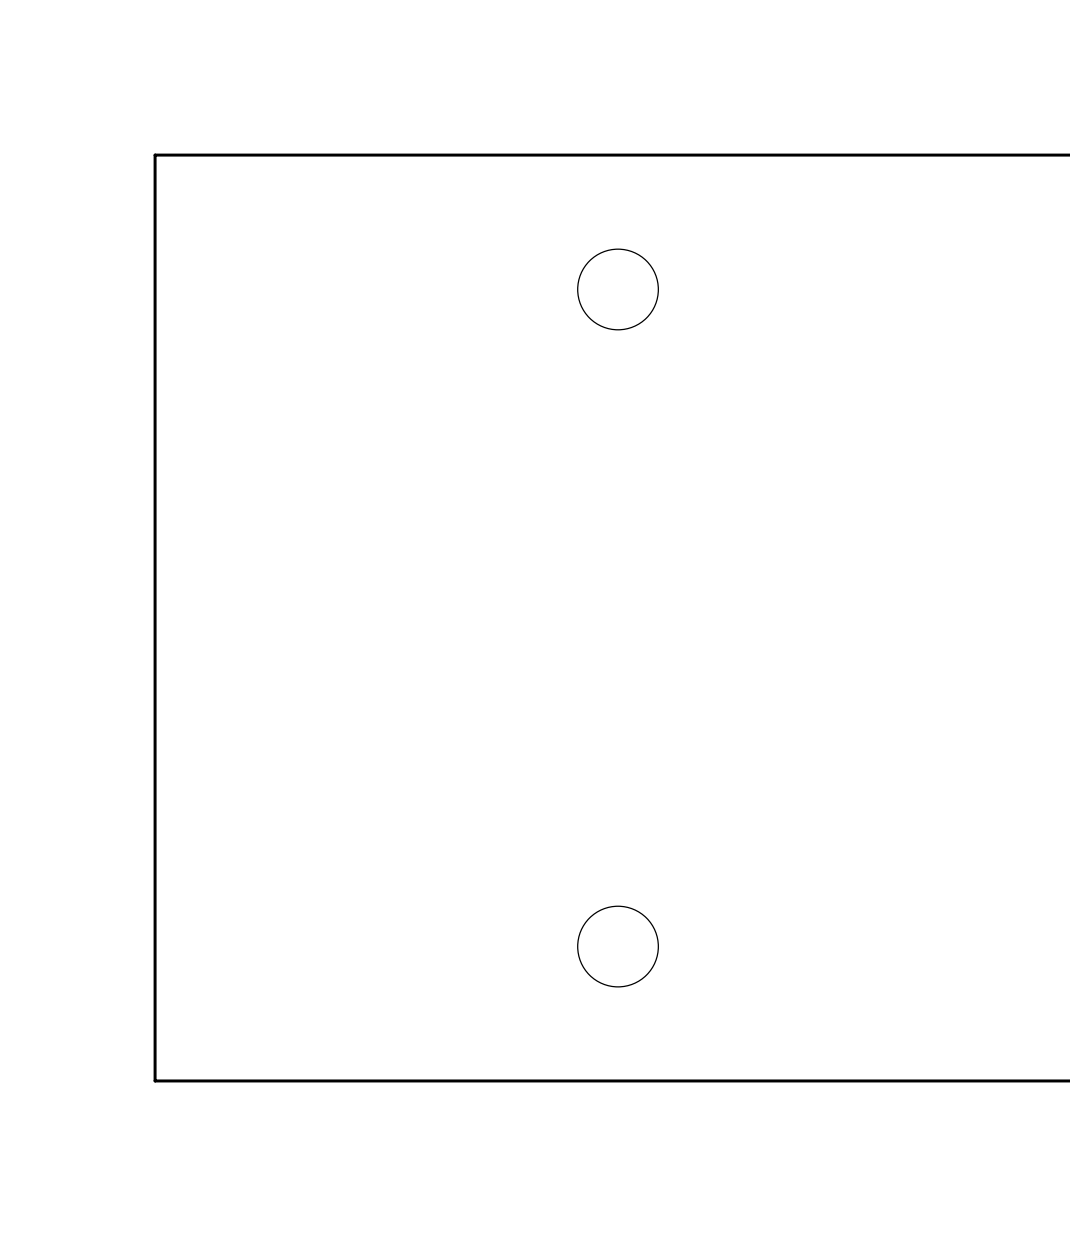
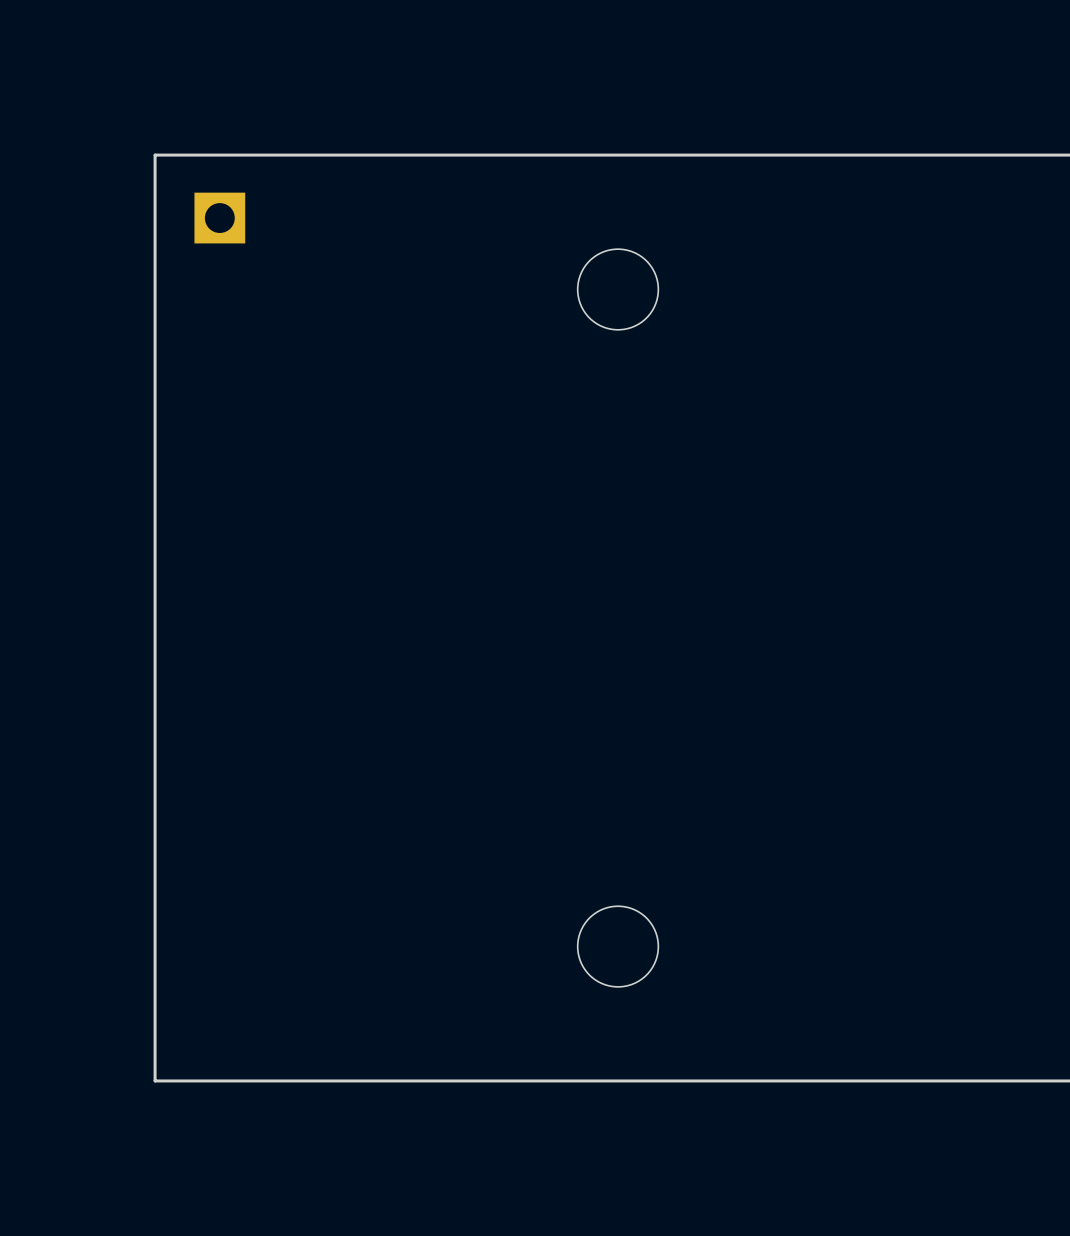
part: none -> (219, 218)

